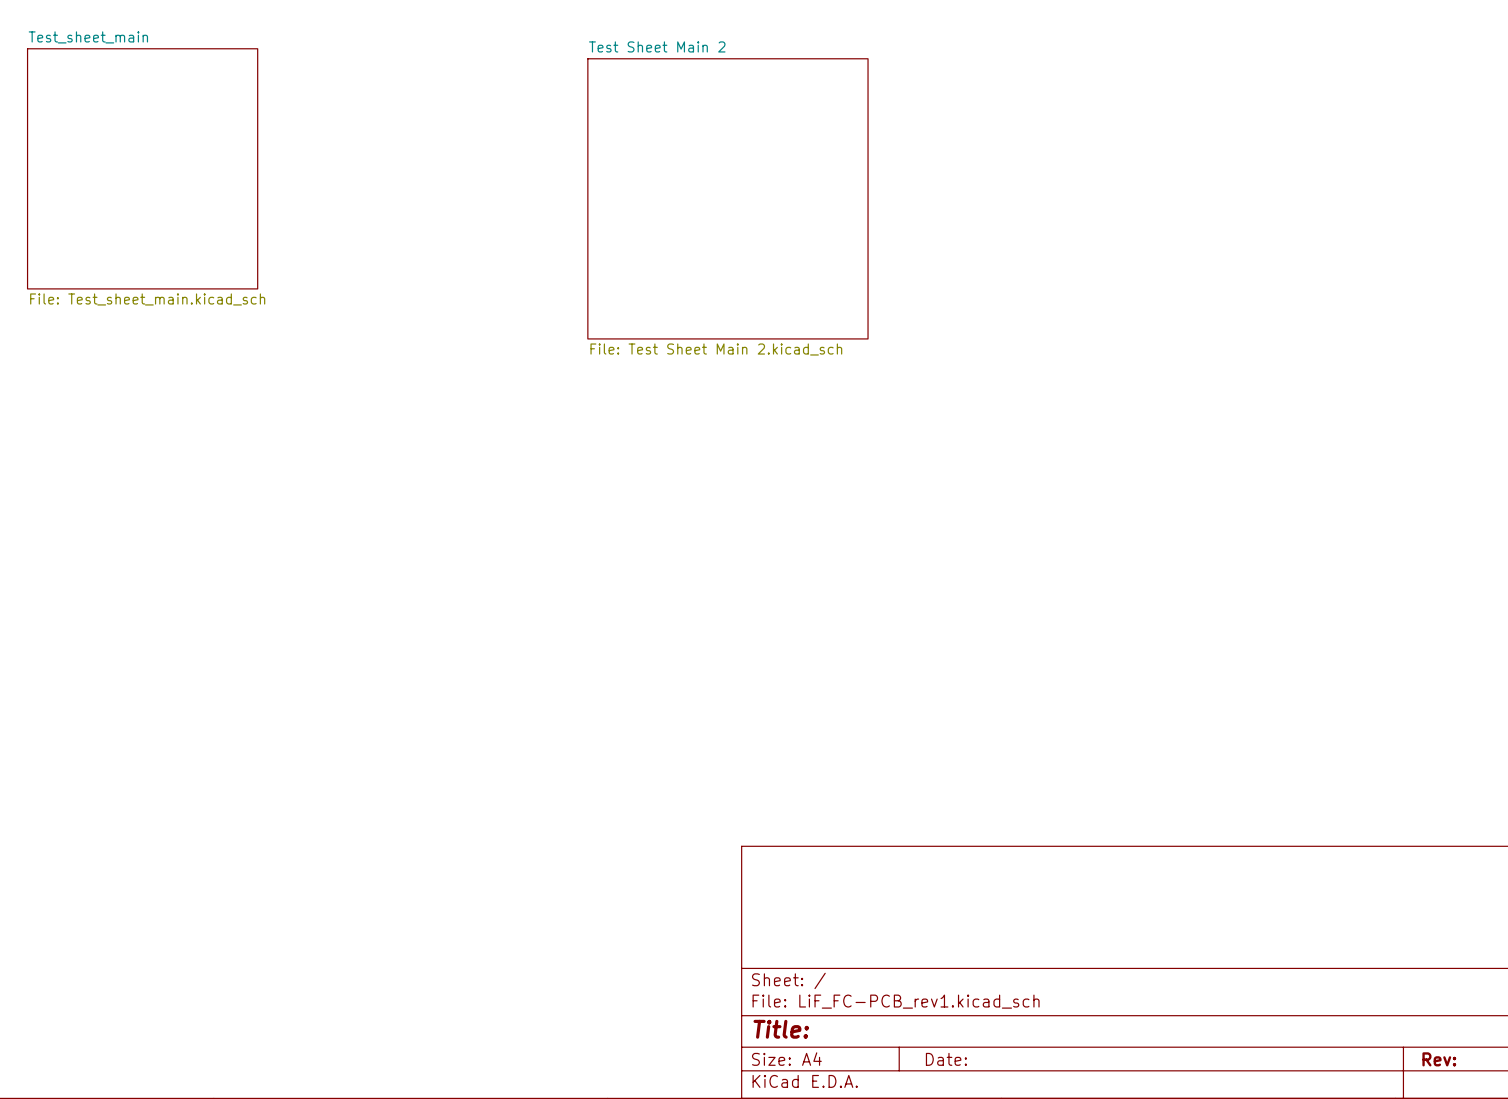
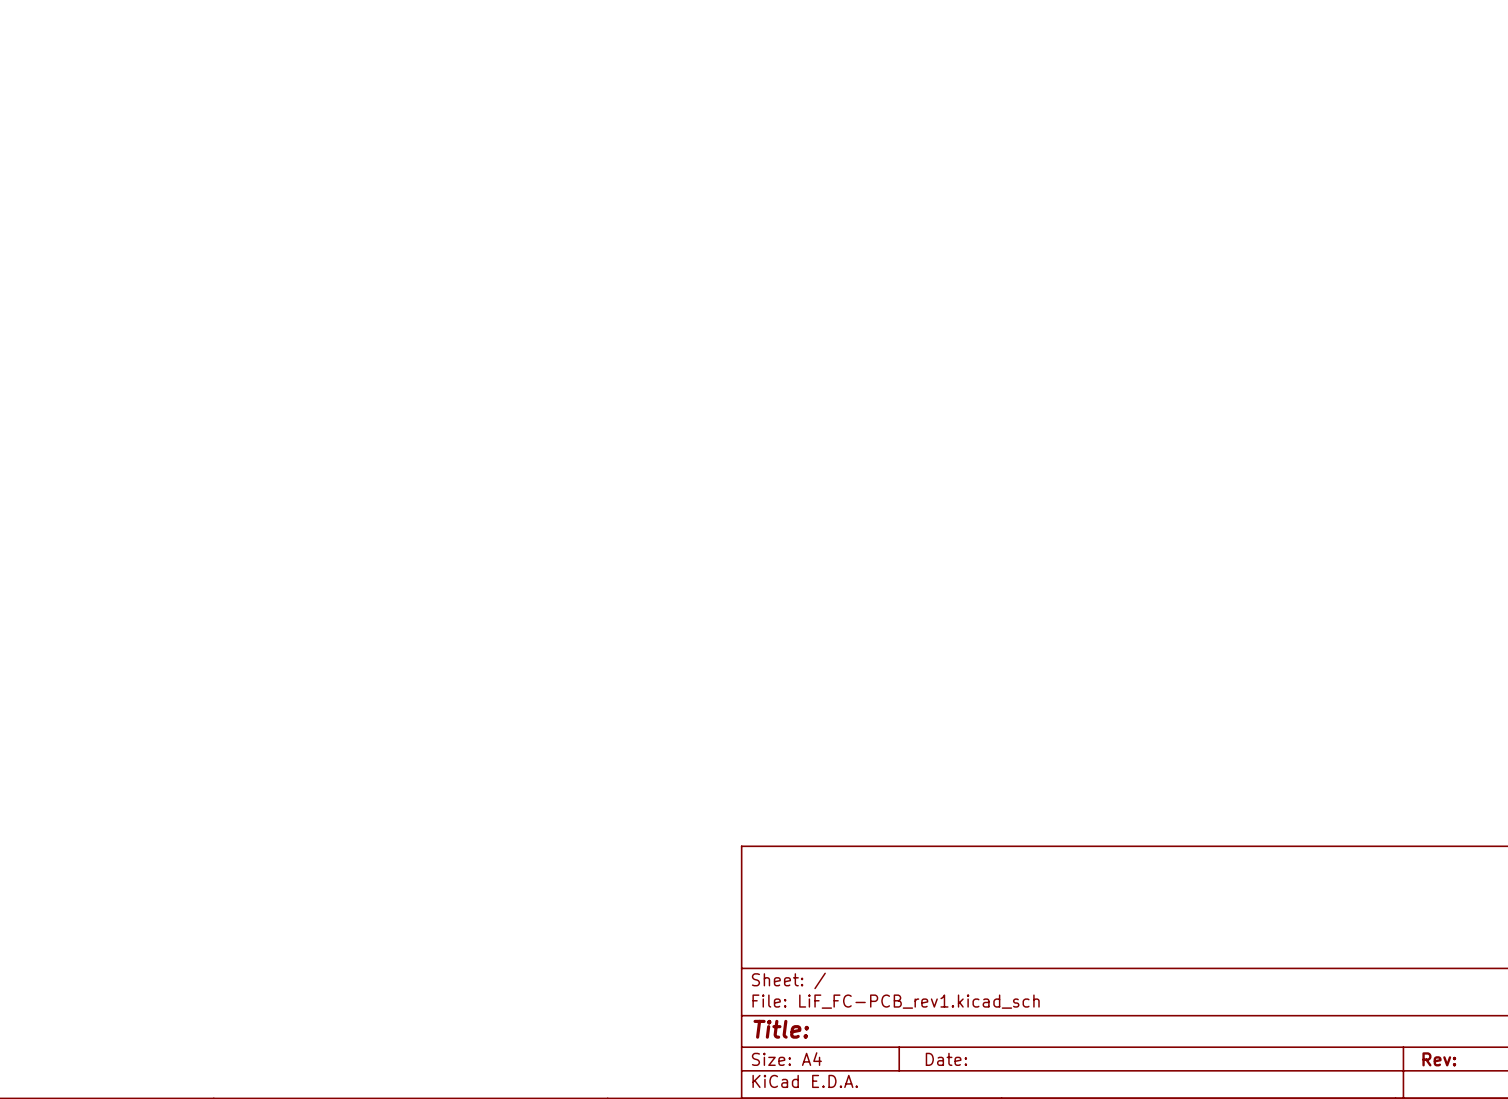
sheet Test_sheet_main: File: Test_sheet_main.kicad_sch (142, 168) -> none
sheet Test Sheet Main 2: File: Test Sheet Main 2.kicad_sch (727, 198) -> none

